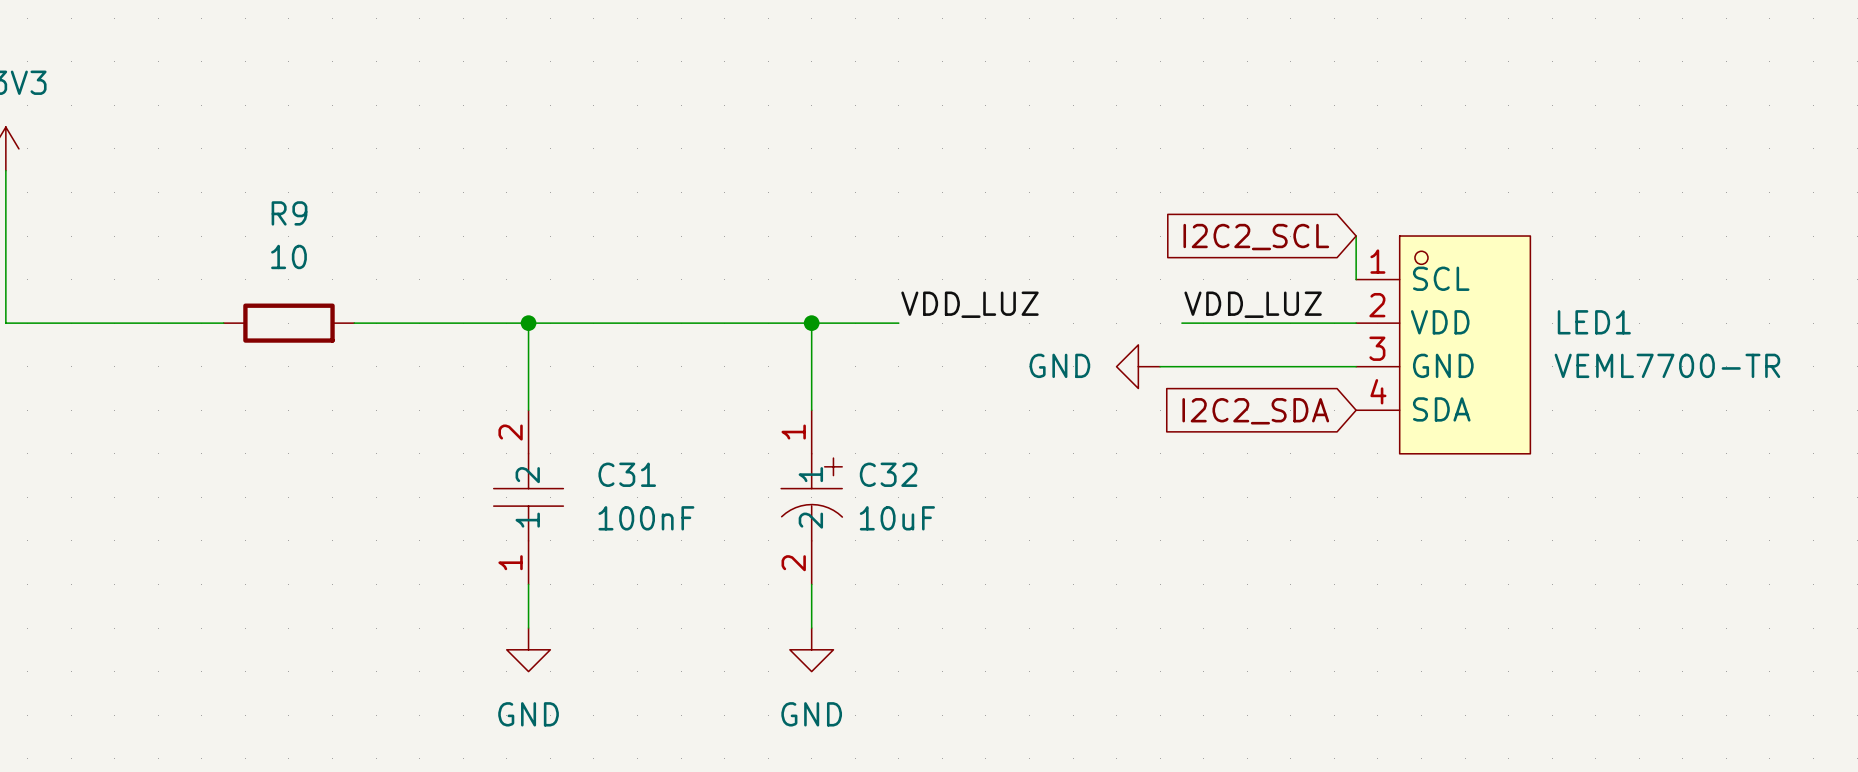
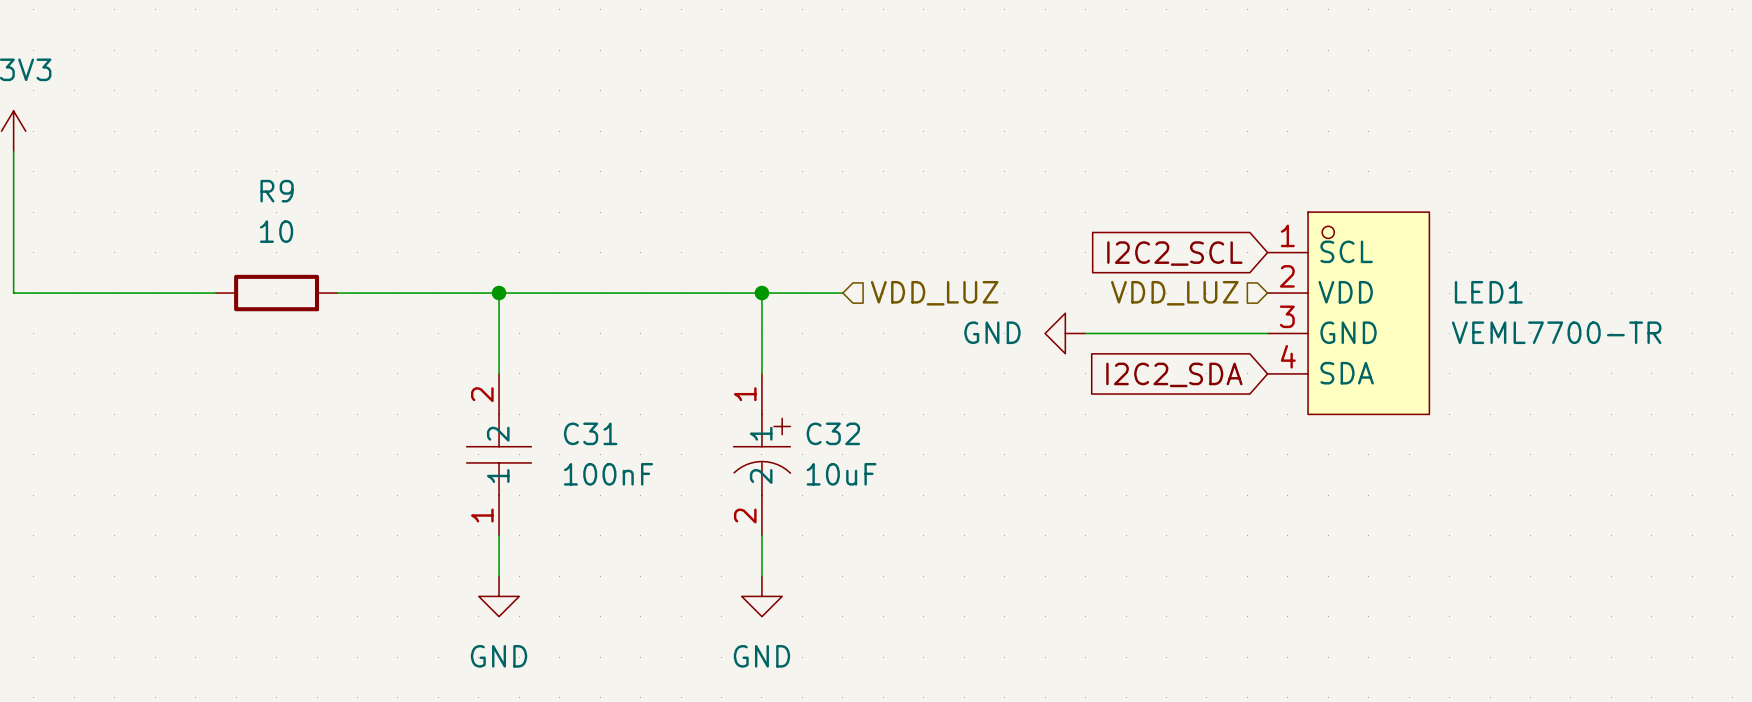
wire: (1356, 236) (1356, 279) -> none
global label position: I2C2_SCL (1256, 237) -> I2C2_SCL (1174, 253)
label: VDD_LUZ (969, 304) -> none
label: VDD_LUZ (1253, 304) -> none
hierarchical label: none -> VDD_LUZ (934, 293)
wire: (1181, 323) (1356, 323) -> none
hierarchical label: none -> VDD_LUZ (1174, 293)

